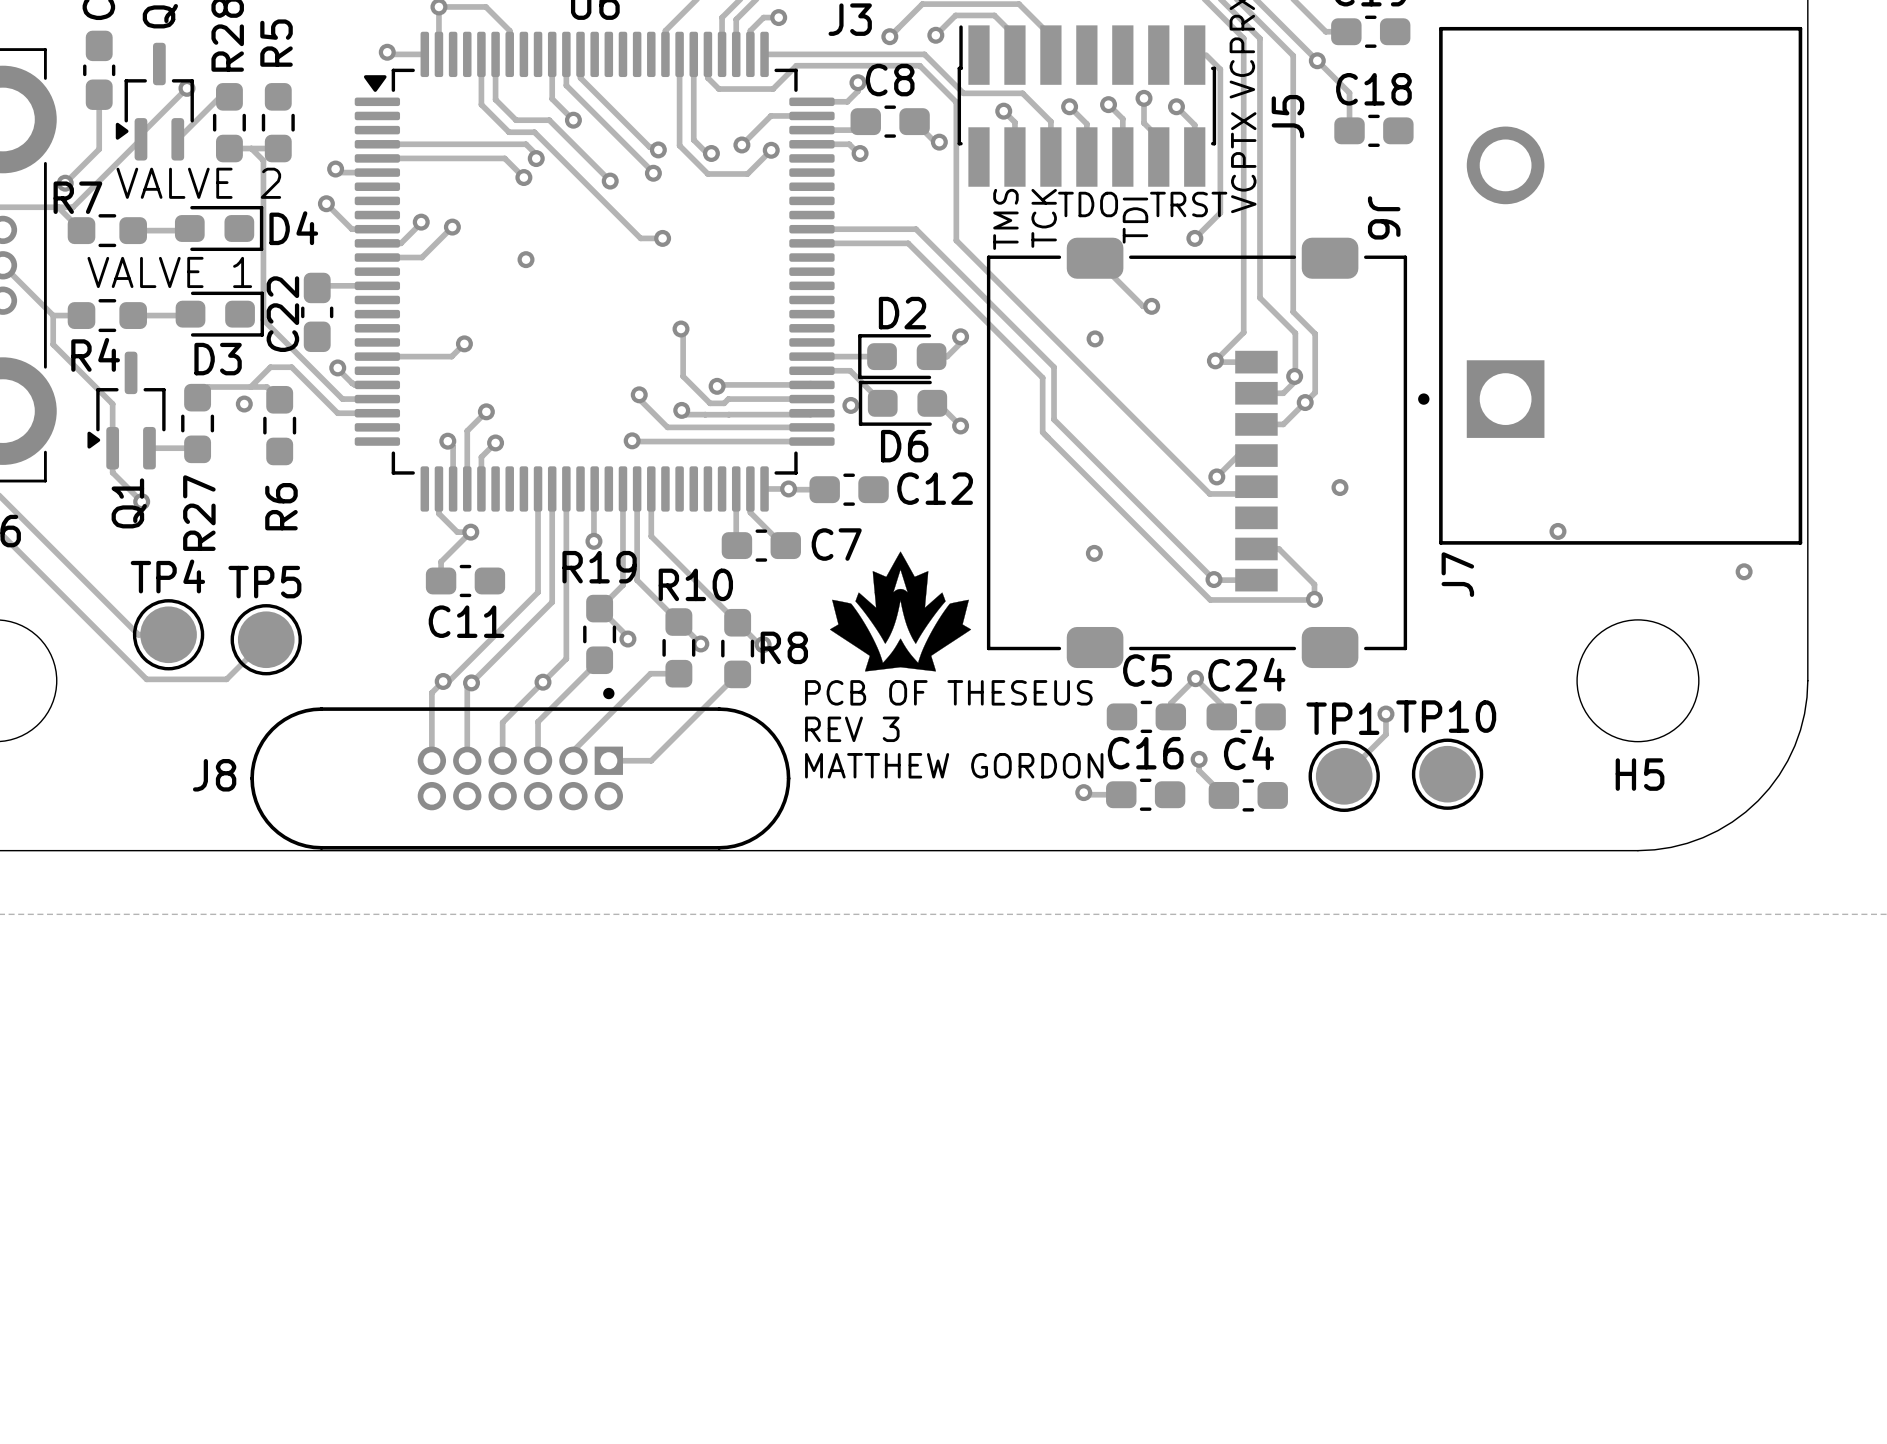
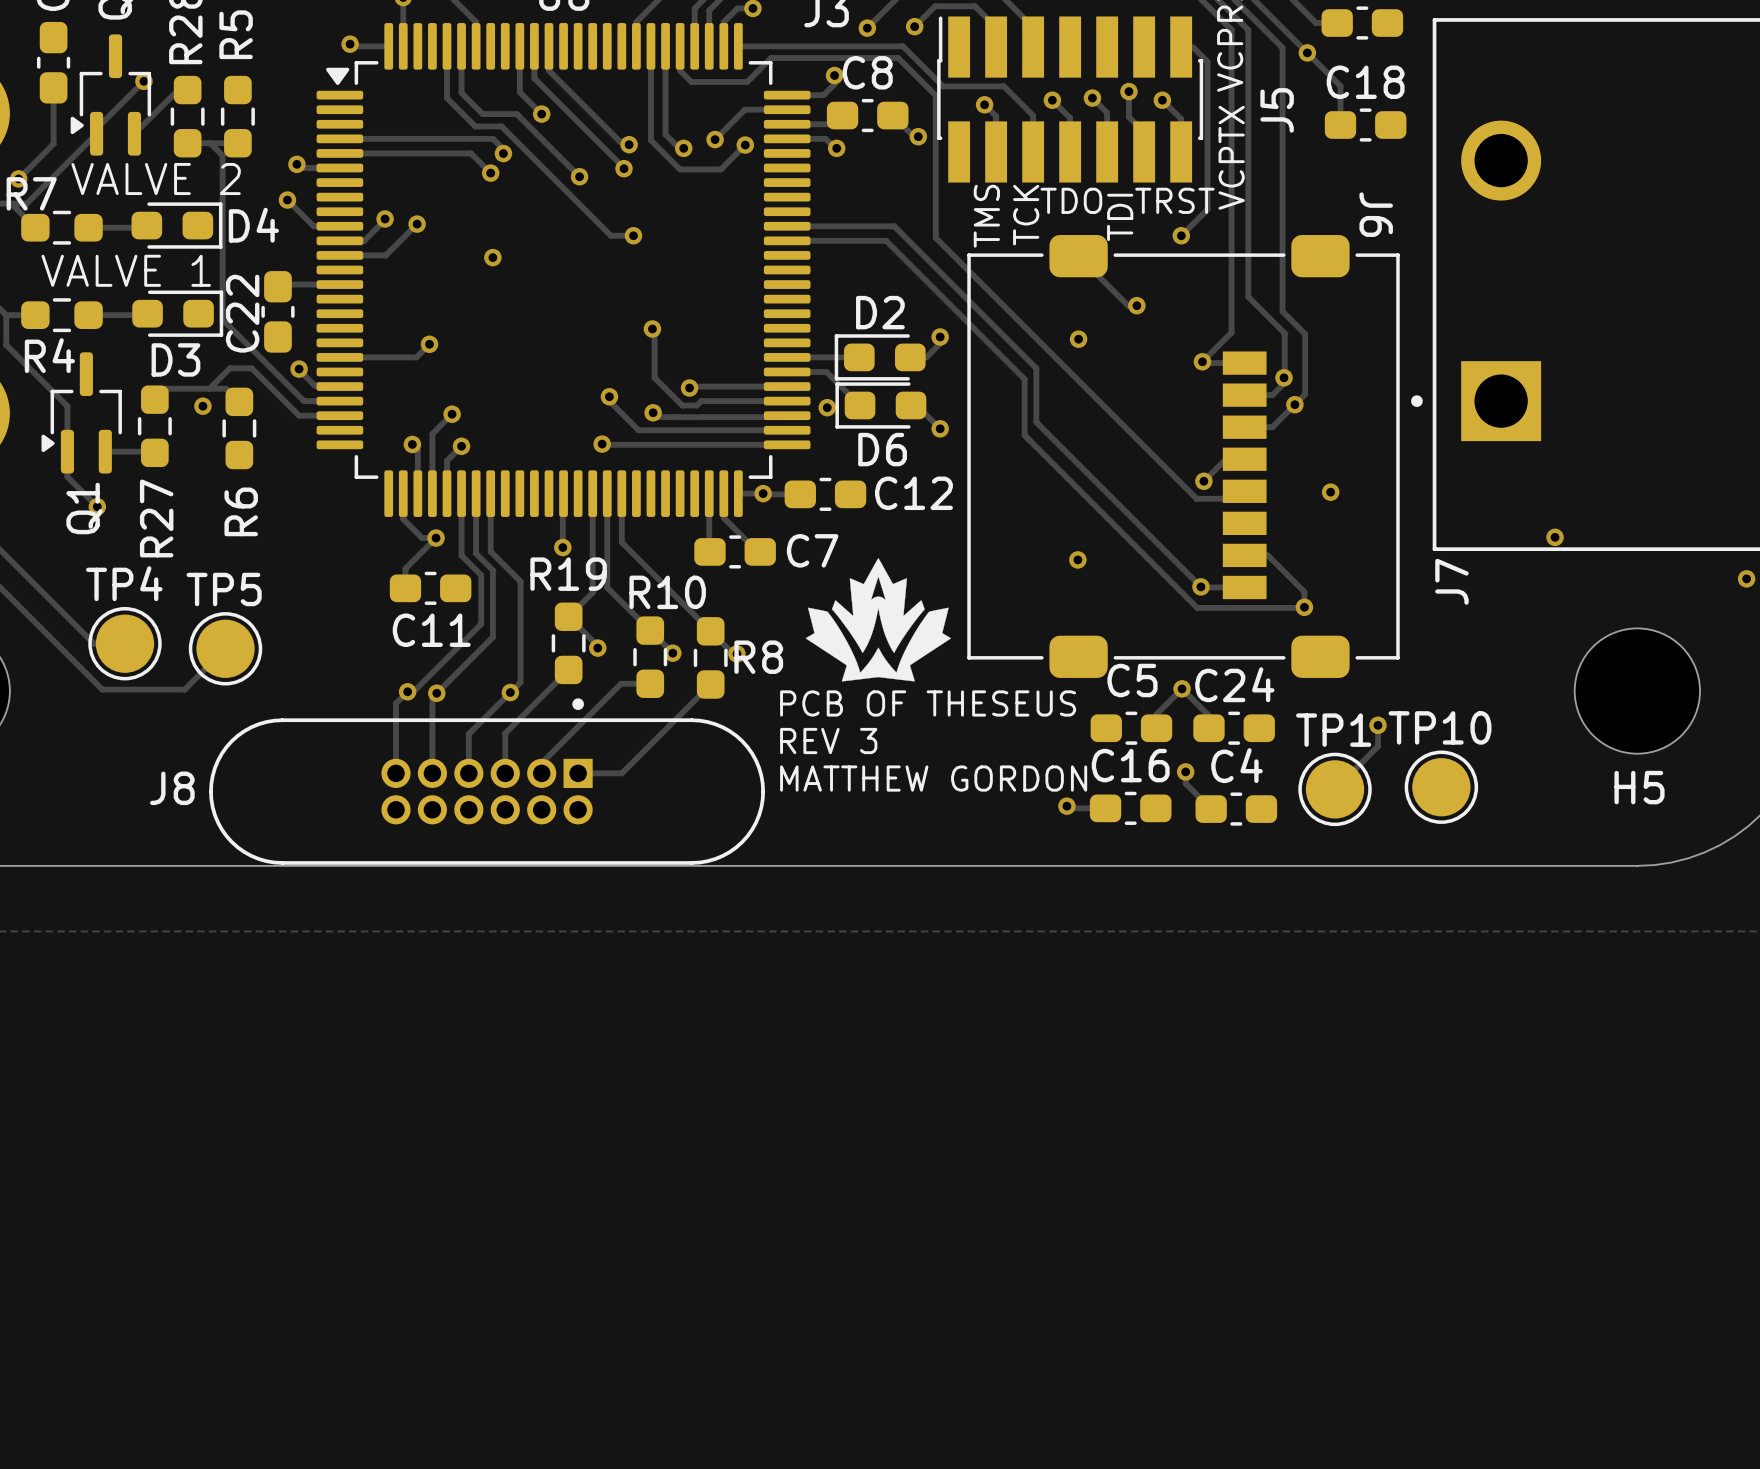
track: (538, 488) (538, 592) (514, 615) -> (461, 493) (461, 555) (481, 575) (481, 624)
track: (552, 488) (552, 602) (526, 628) -> (476, 493) (476, 553) (492, 570) (492, 637)
track: (566, 488) (566, 658) (552, 672) -> (490, 493) (490, 551) (520, 581) (520, 682)

